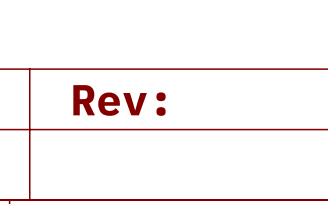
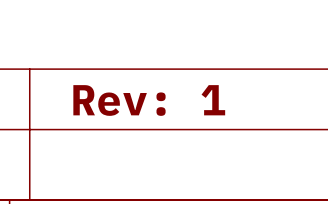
title block: Rev: (119, 100) -> Rev: 1 (149, 100)

